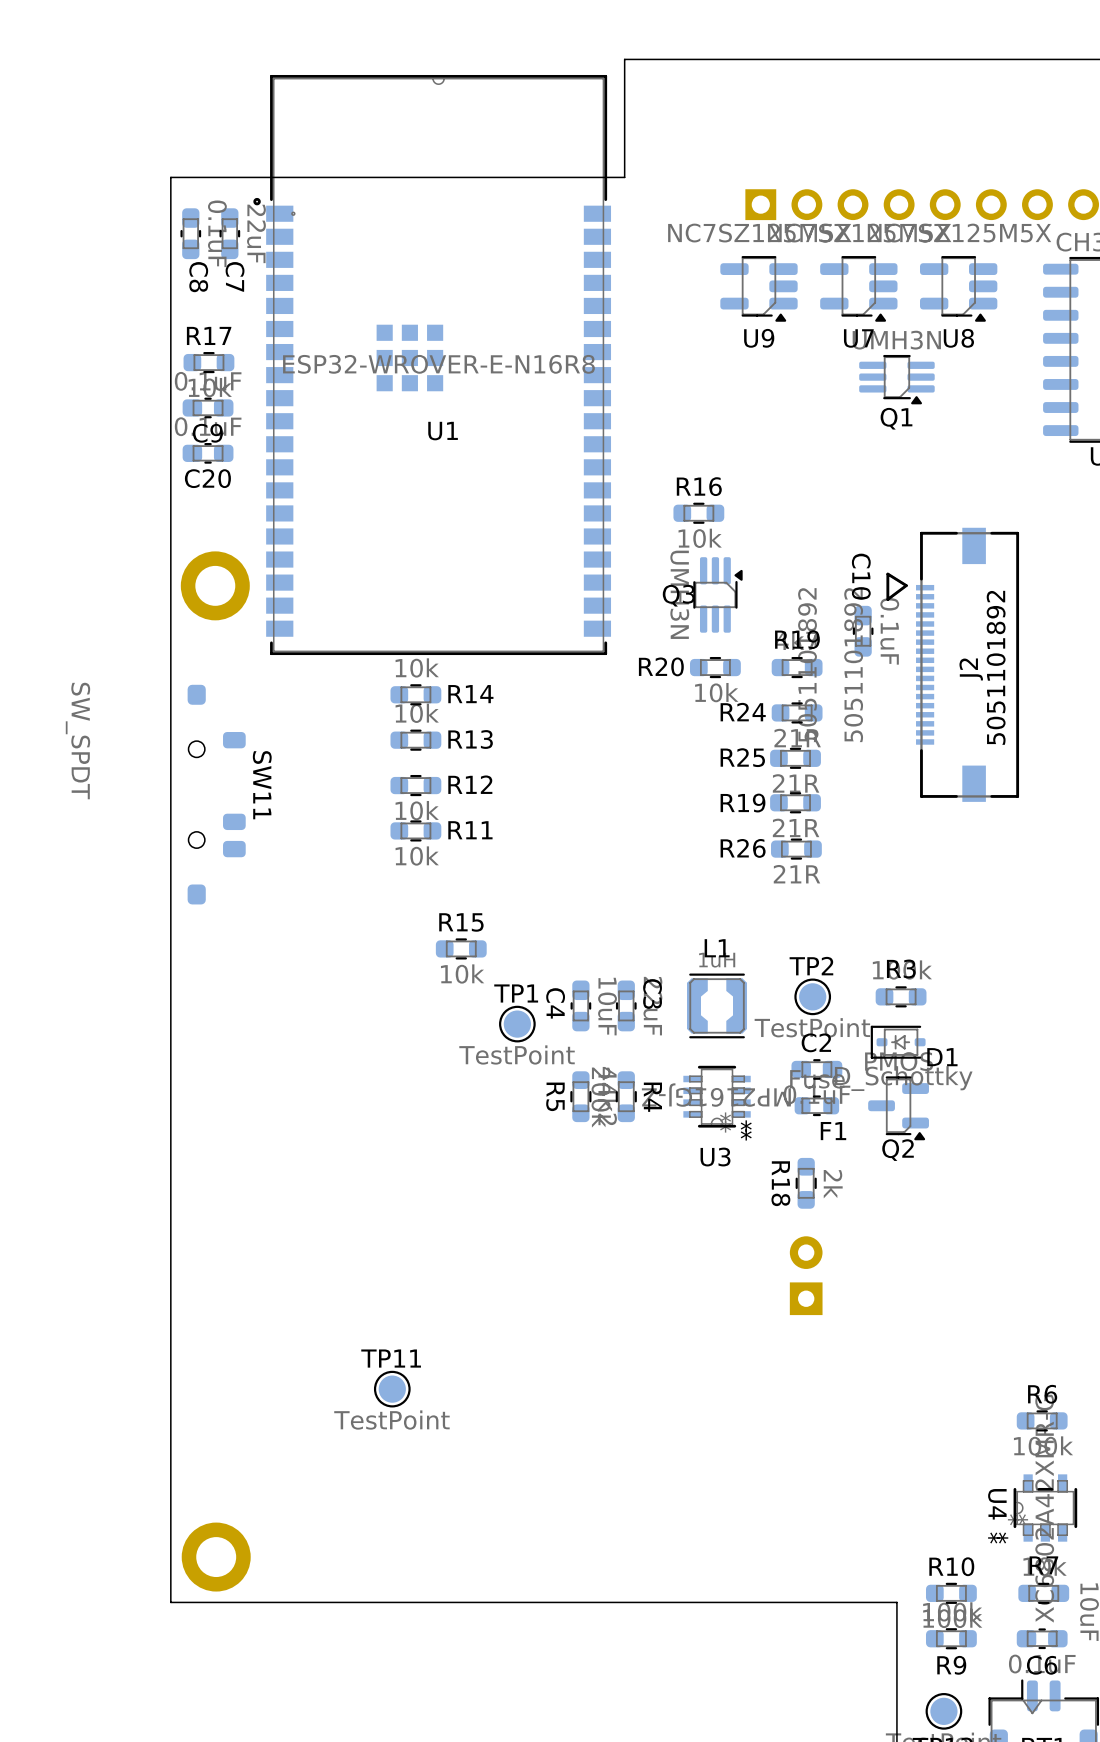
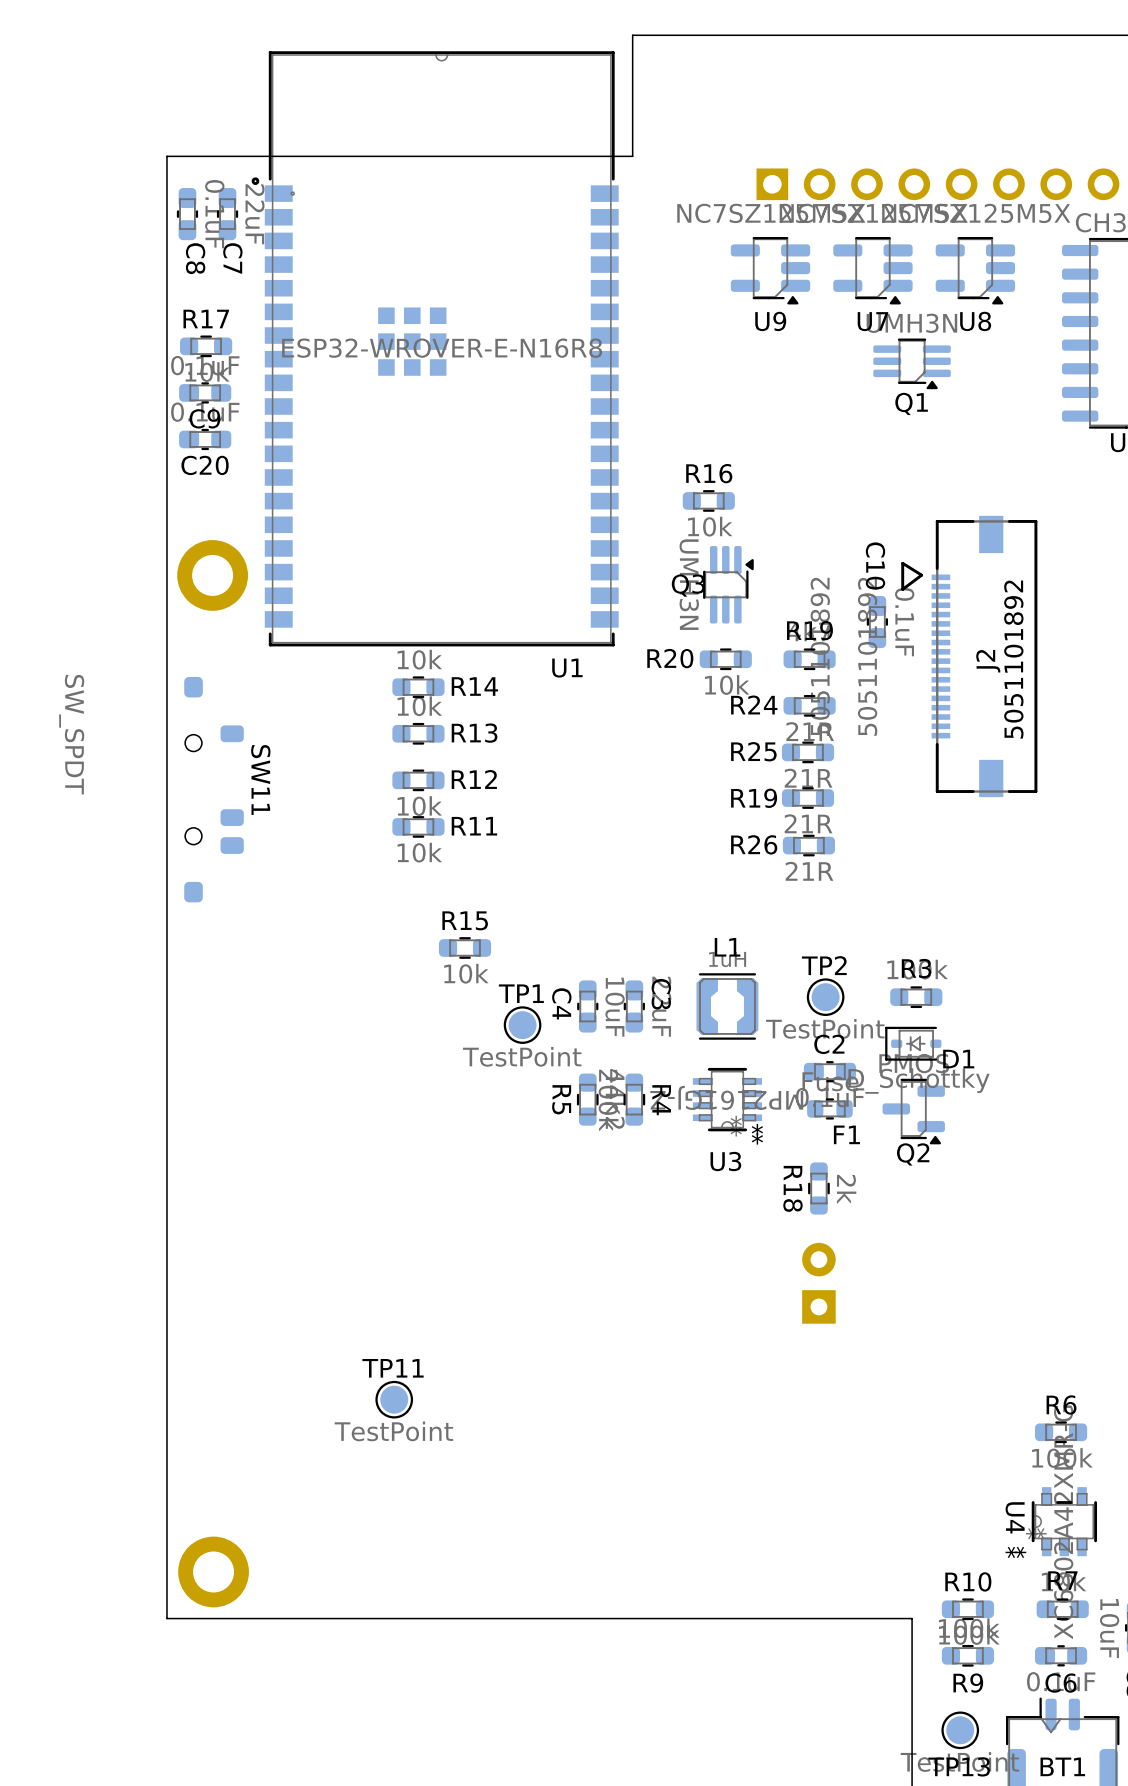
U1 name position: U1 (443, 431) -> U1 (567, 668)

